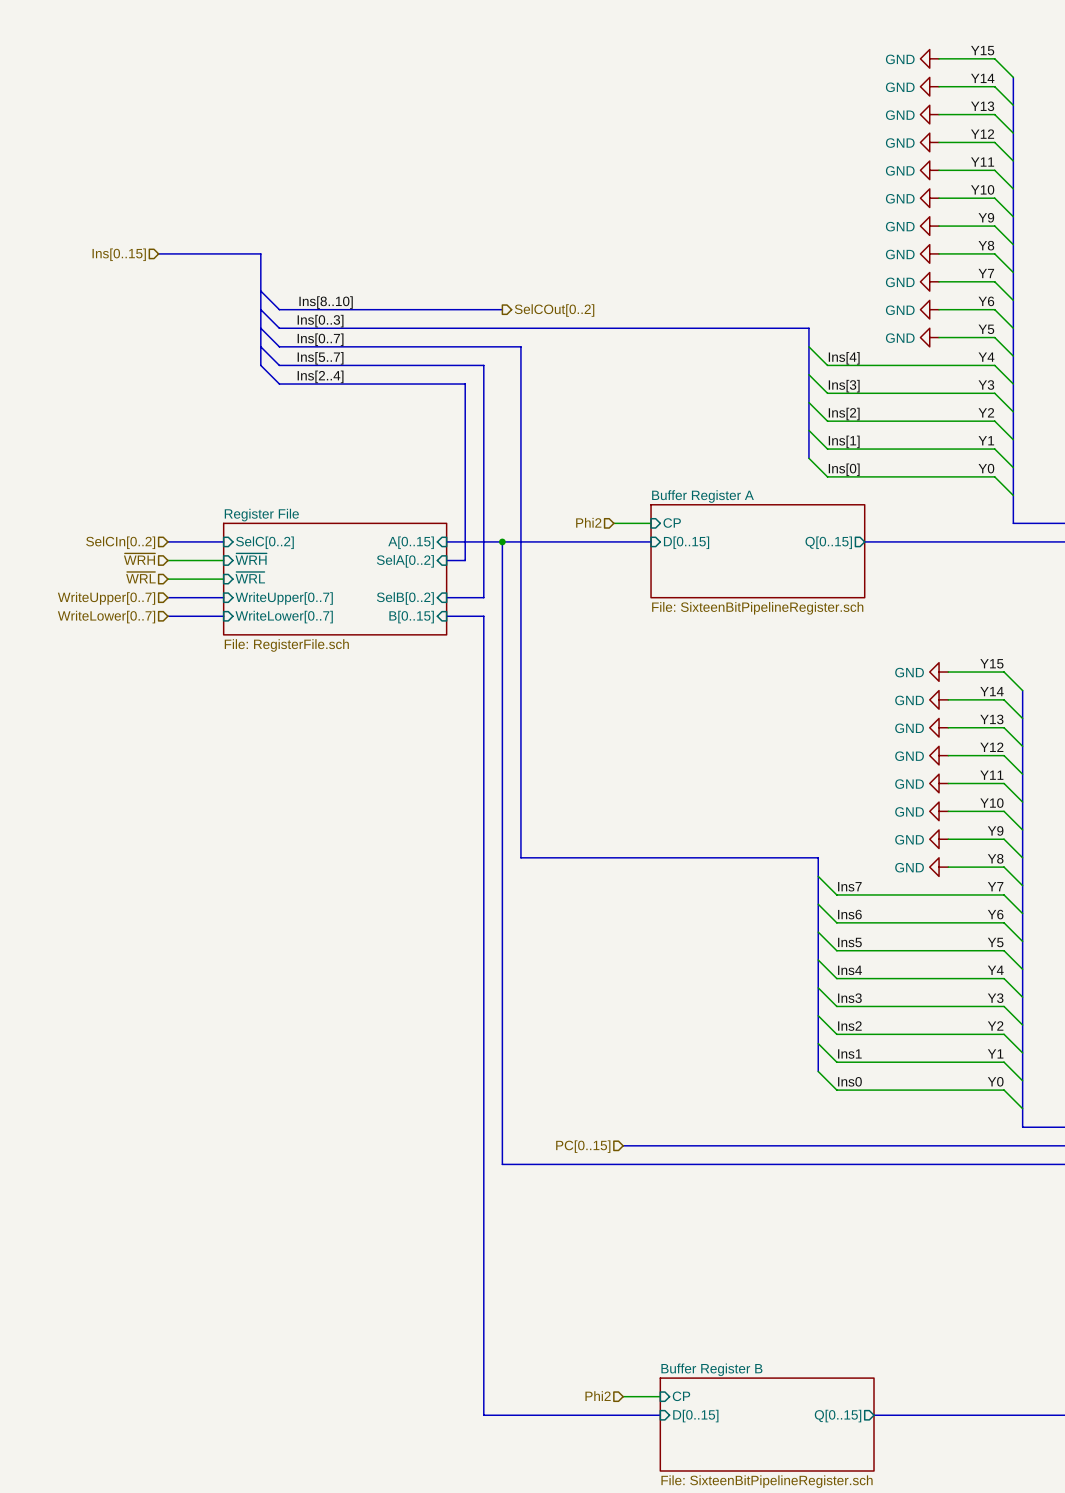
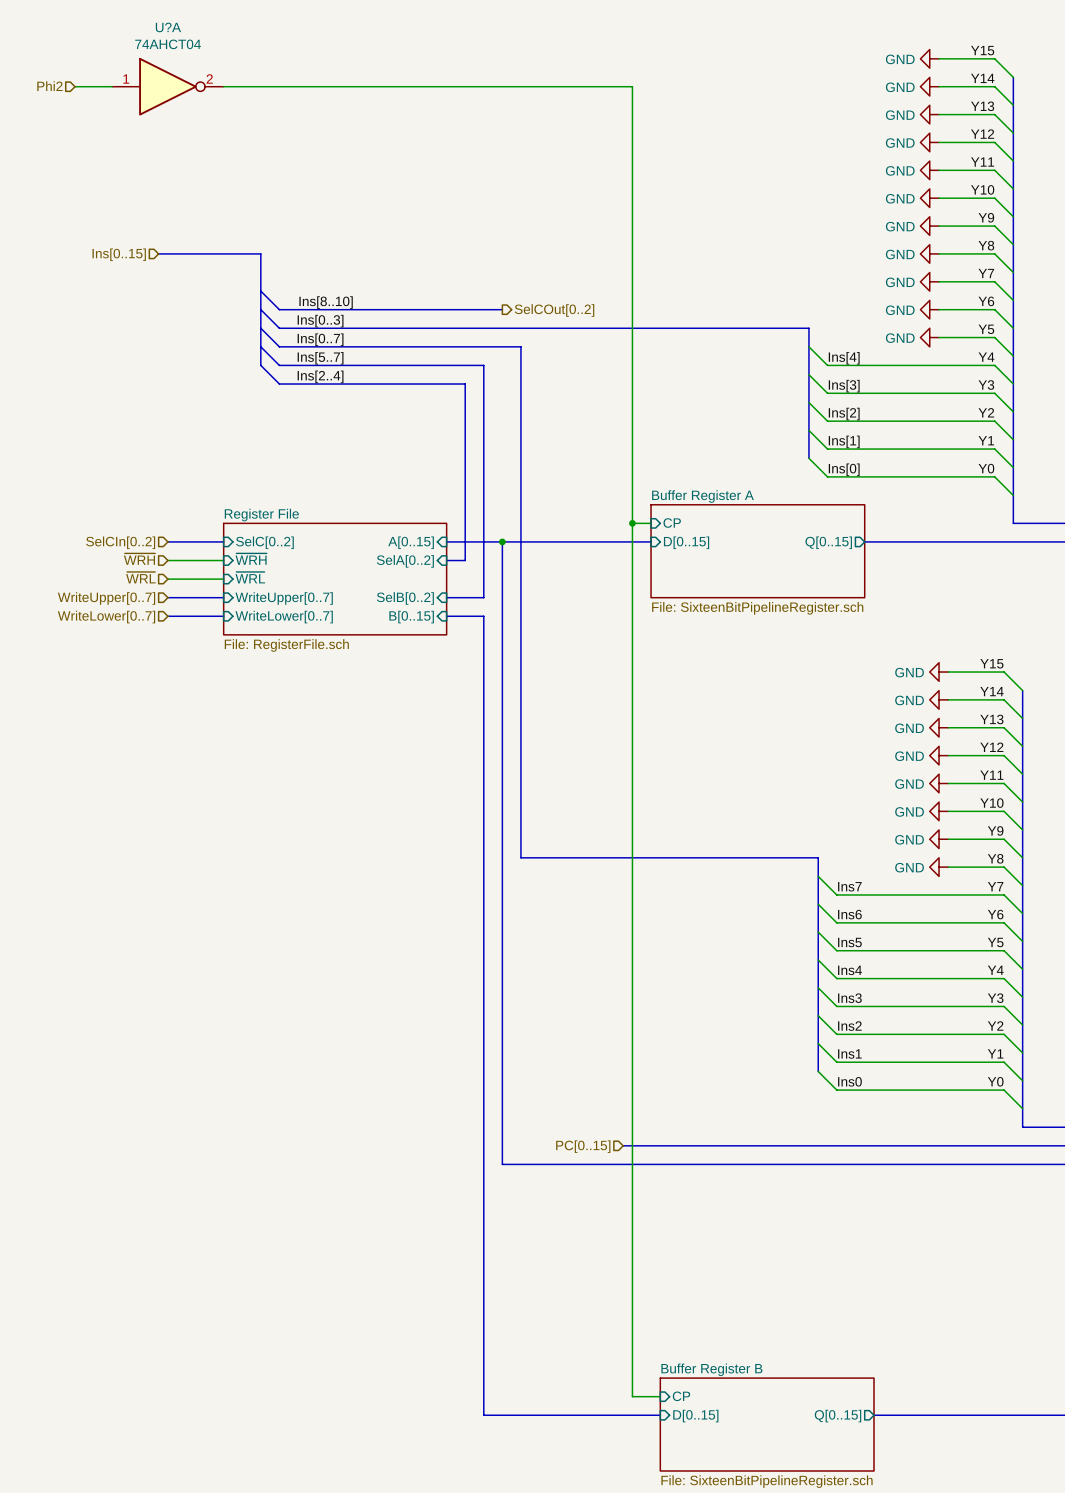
hierarchical label: none -> Phi2 (49, 86)
wire: none -> (75, 86) (112, 86)
U?A: none -> 74AHCT04 (167, 86)
hierarchical label: Phi2 (588, 522) -> none
wire: (613, 523) (632, 523) -> none
junction: none -> (632, 523)
hierarchical label: Phi2 (598, 1396) -> none
wire: (623, 1396) (632, 1396) -> (223, 86) (632, 86) (632, 1396)

